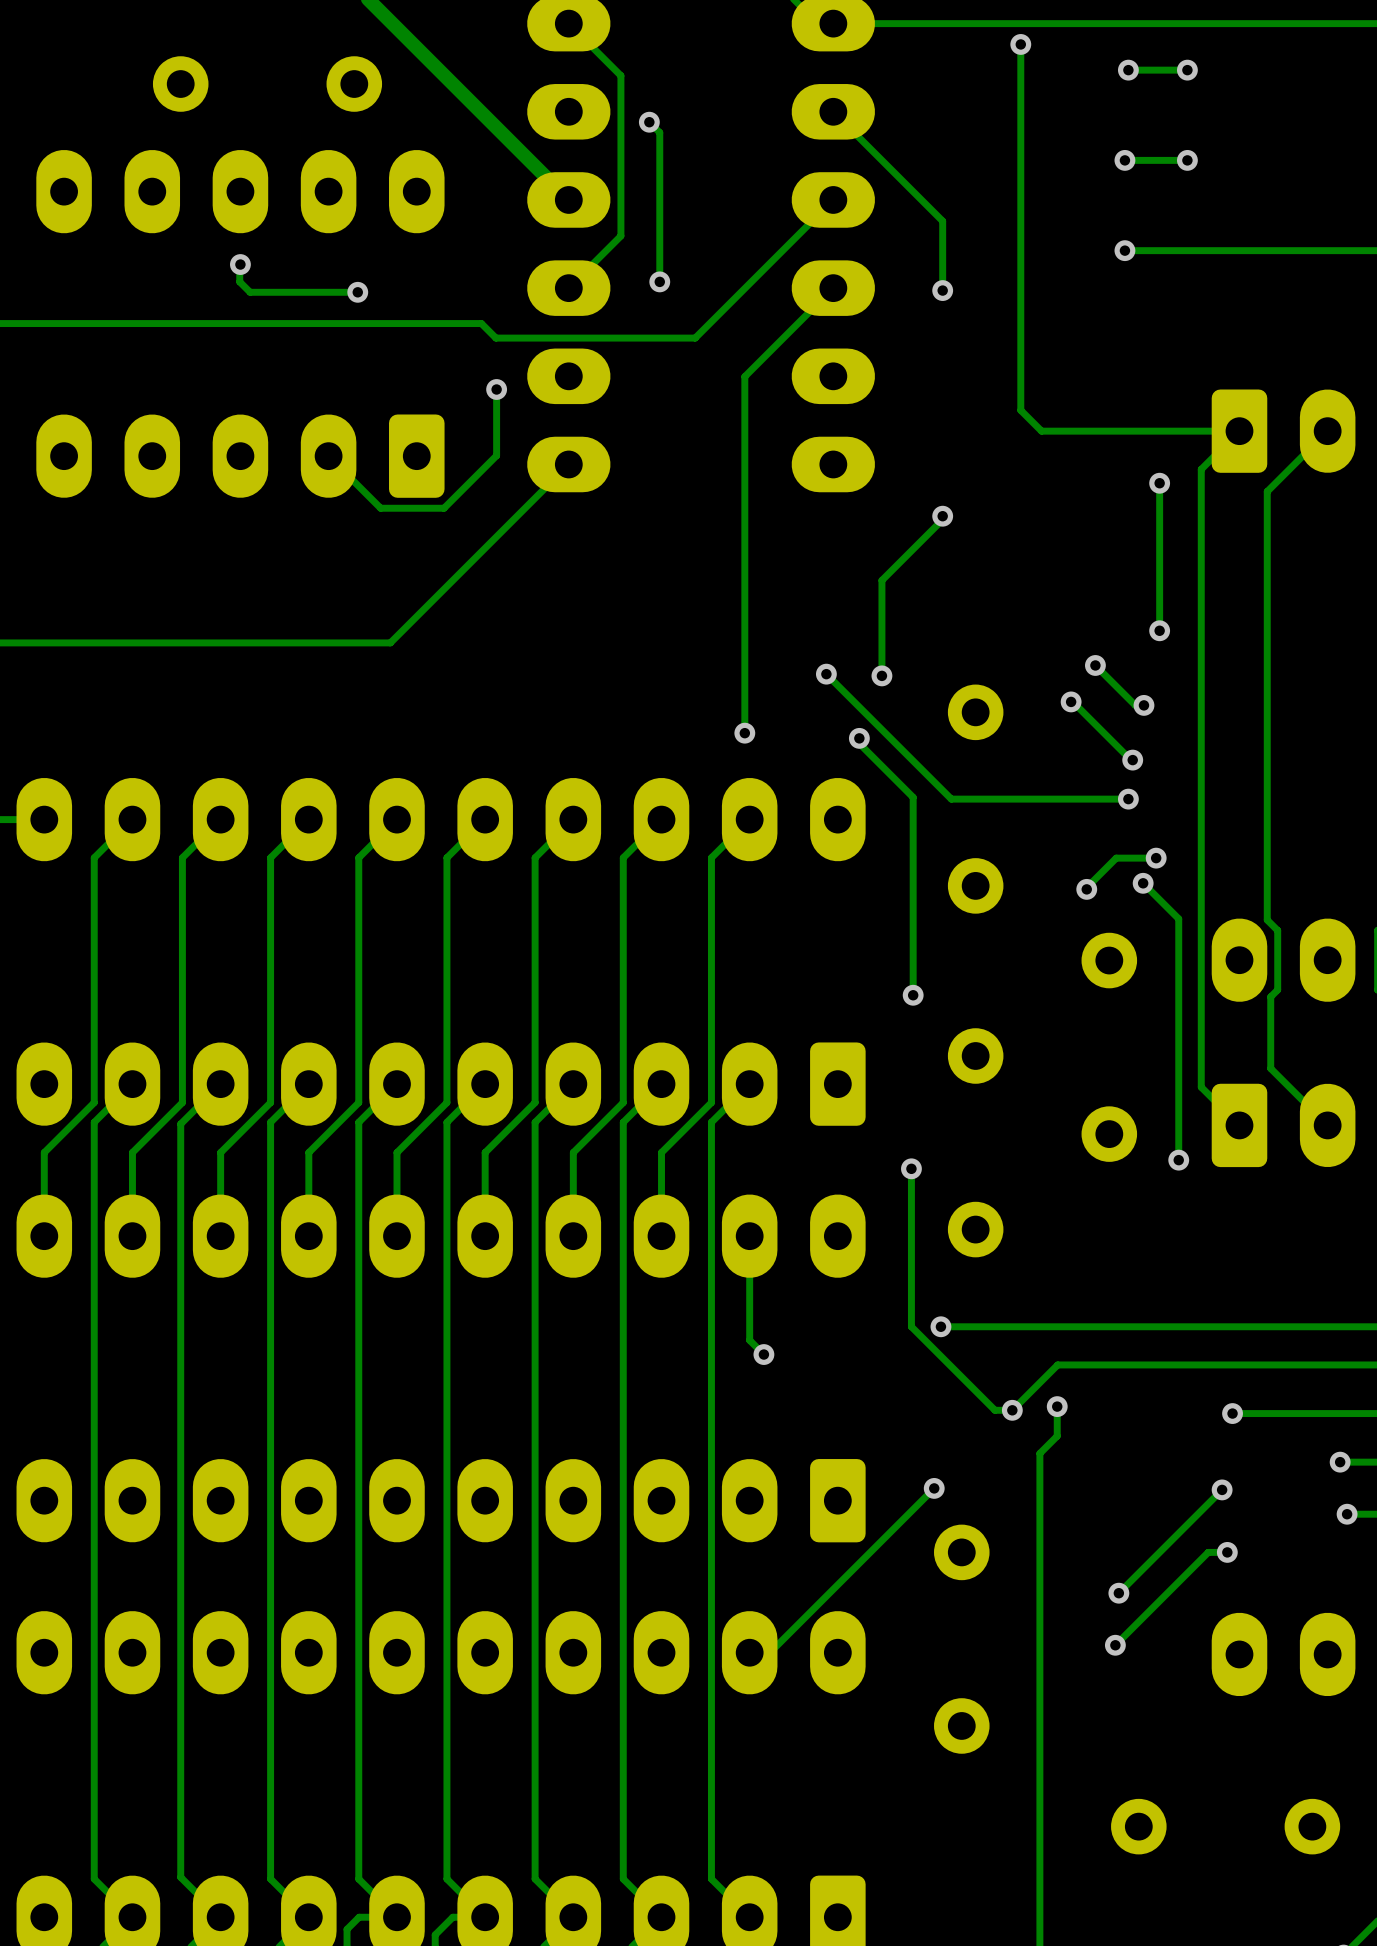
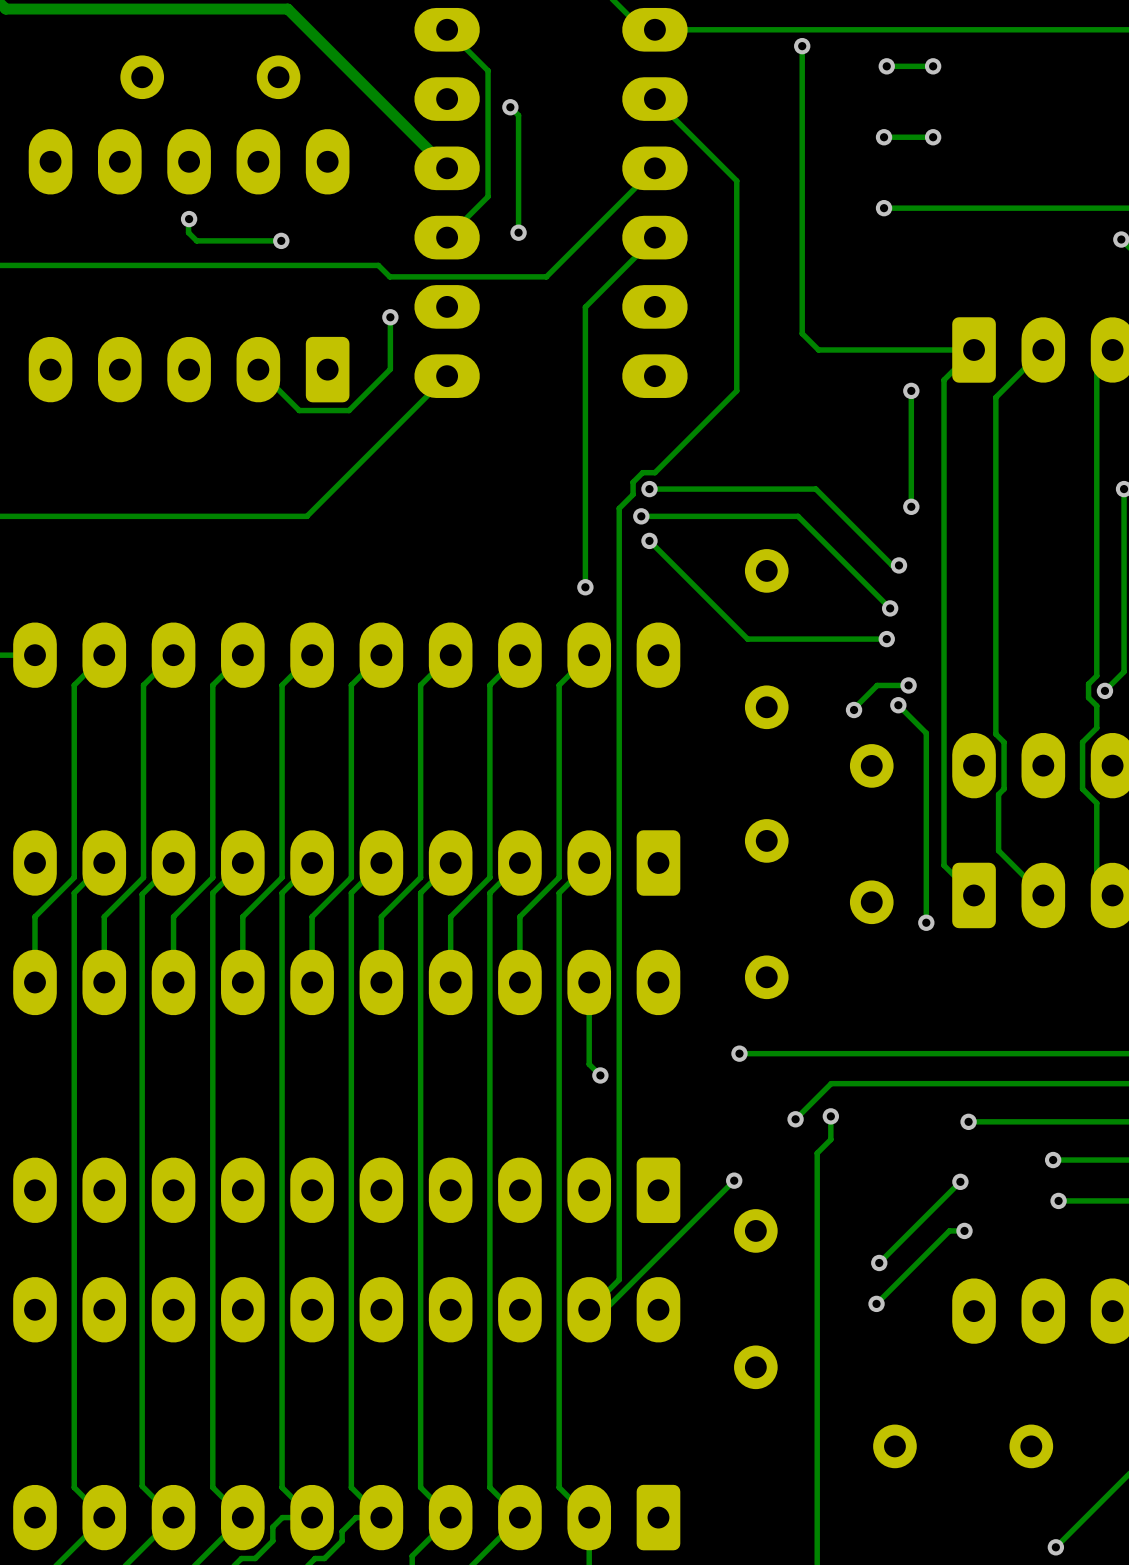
track: (937, 215) (942, 221) (942, 290) -> (736, 180) (736, 390) (654, 472) (642, 472) (633, 482) (633, 494) (619, 508) (619, 1279) (589, 1309)
via: (942, 290) -> none
track: (942, 516) (942, 519) (881, 580) (881, 675) -> none
via: (942, 516) -> none
track: none -> (649, 489) (815, 489) (860, 534)
via: none -> (649, 489)
via: none -> (641, 516)
via: (1095, 665) -> none
via: (881, 675) -> none
track: (1071, 701) (1132, 760) -> (641, 516) (798, 516) (890, 608)
via: (1071, 701) -> none
track: (859, 738) (859, 743) (913, 797) (913, 995) -> none
via: (859, 738) -> none
via: (913, 995) -> none
track: (911, 1168) (911, 1326) (994, 1410) (1012, 1410) -> none
via: (911, 1168) -> none

